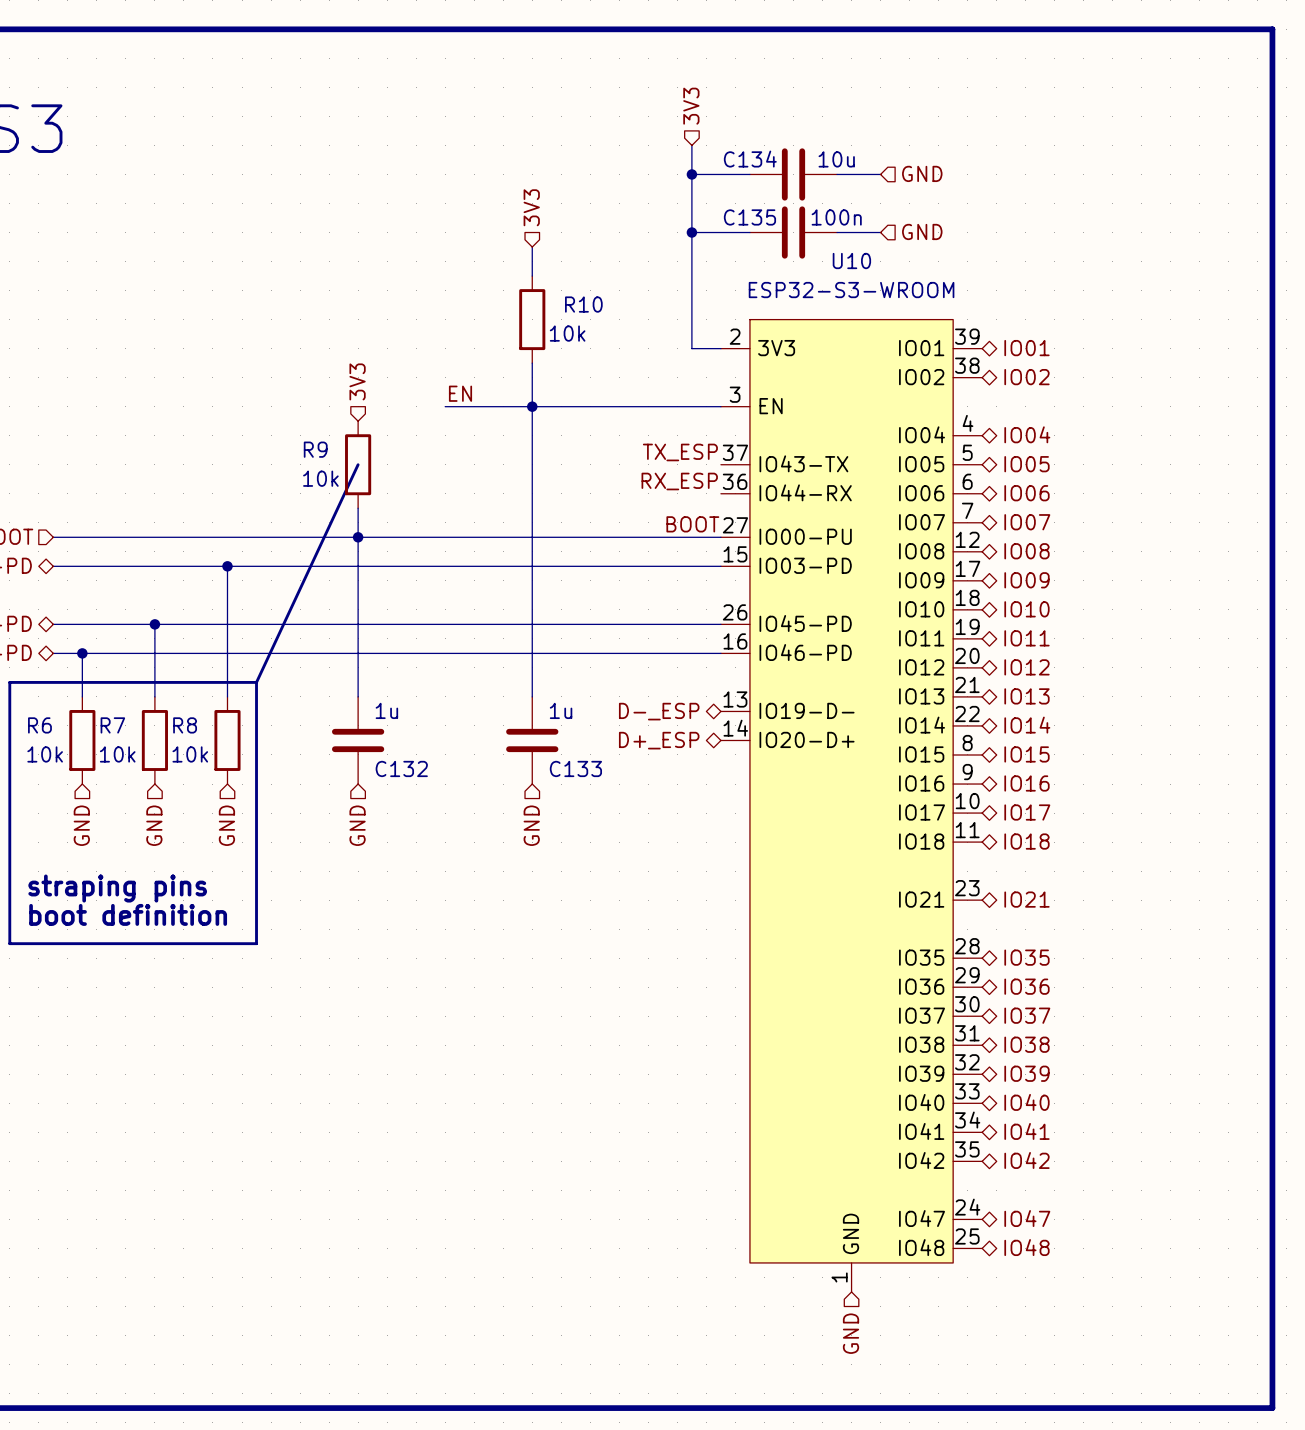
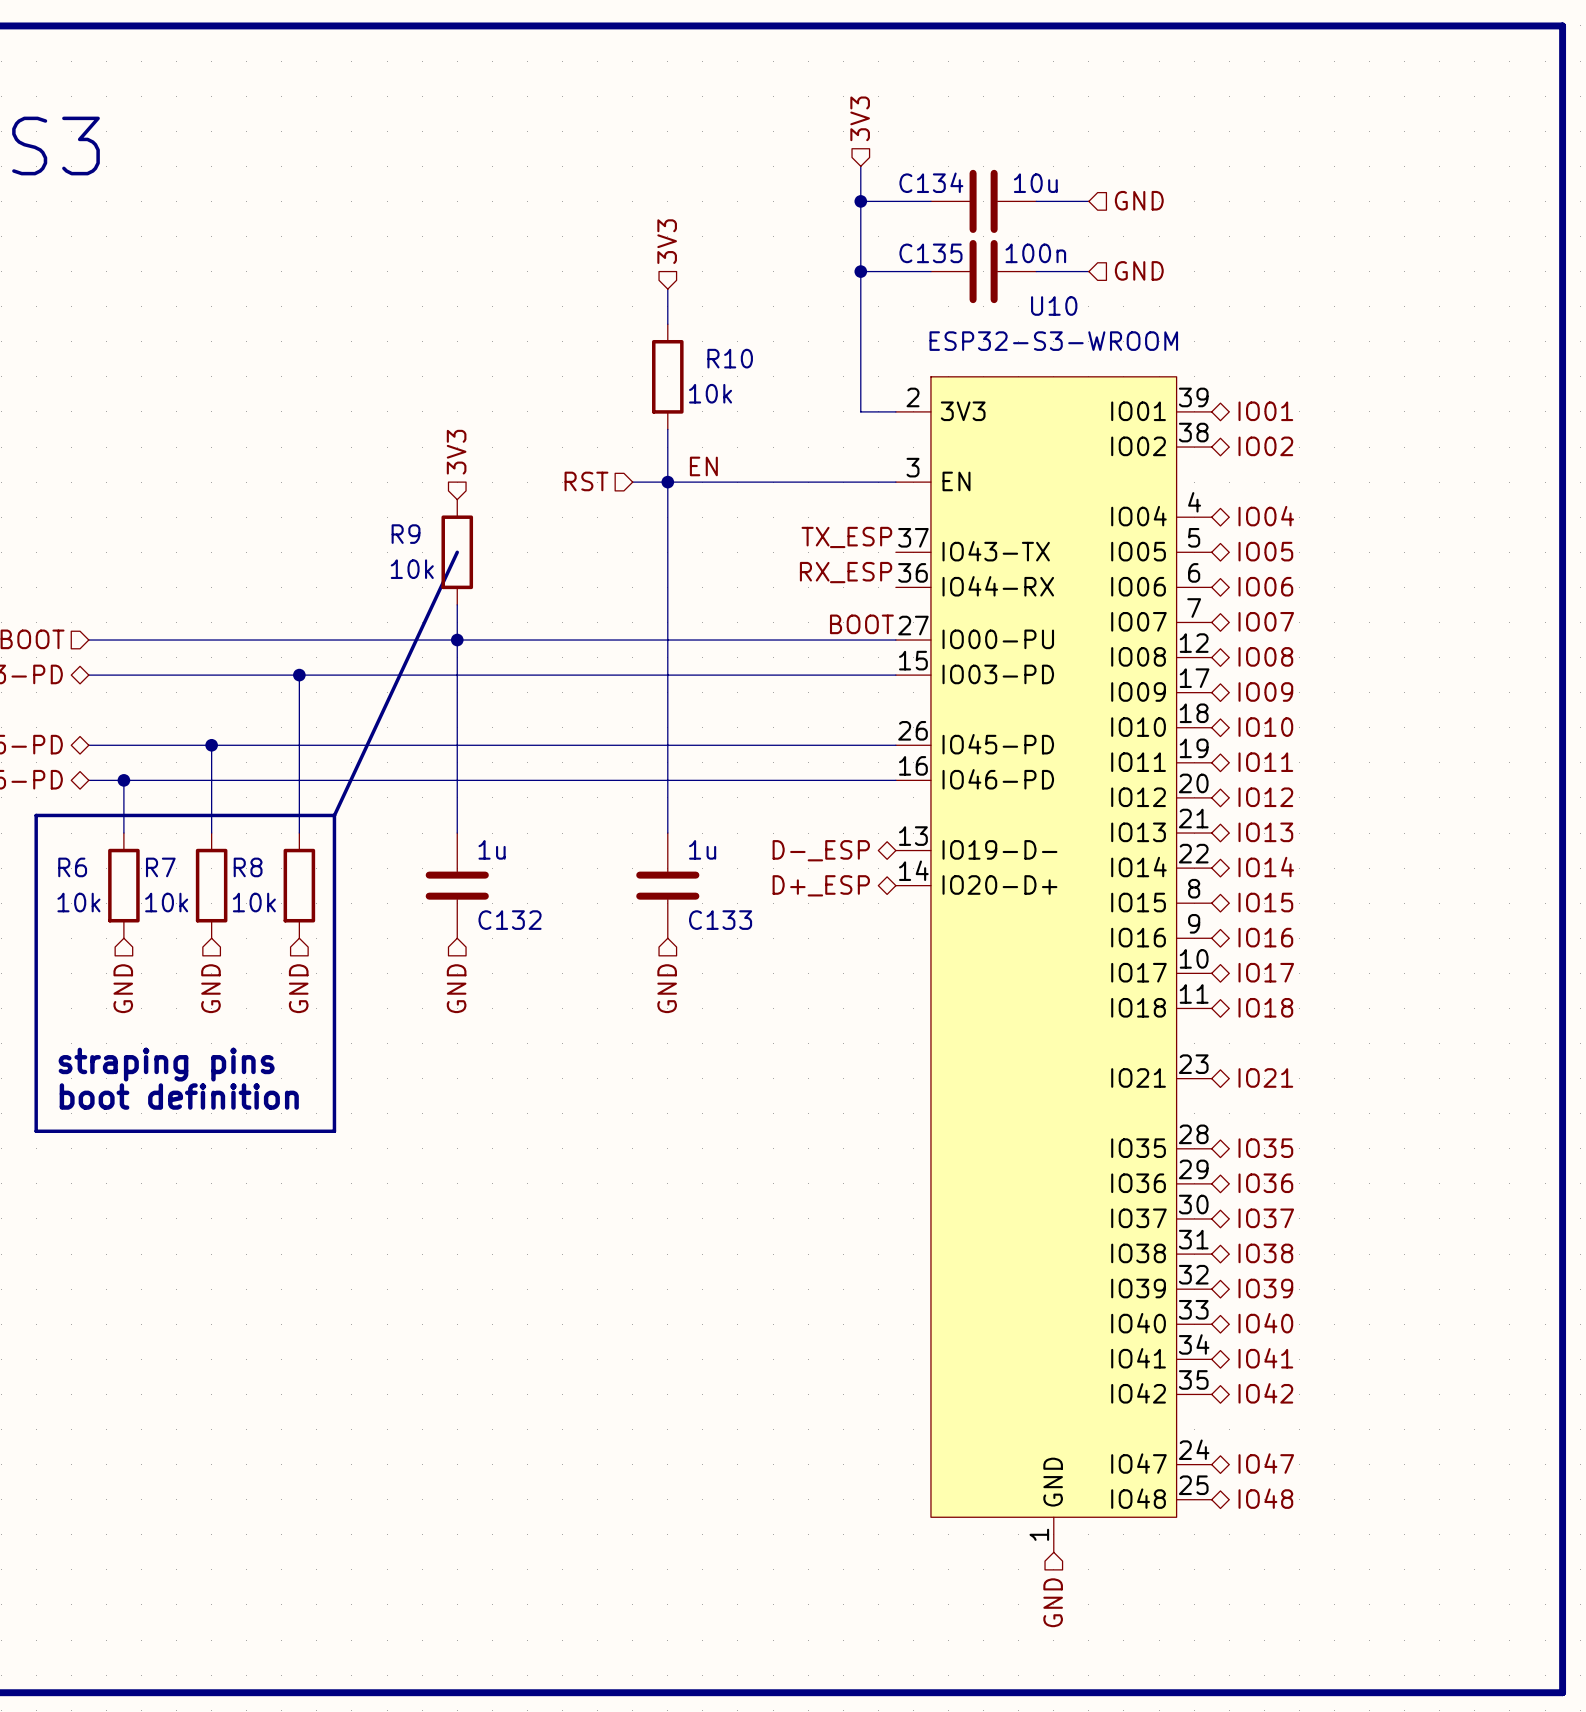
label position: EN (460, 393) -> EN (703, 466)
wire: (445, 406) (503, 406) -> none
hierarchical label: none -> RST (586, 481)

